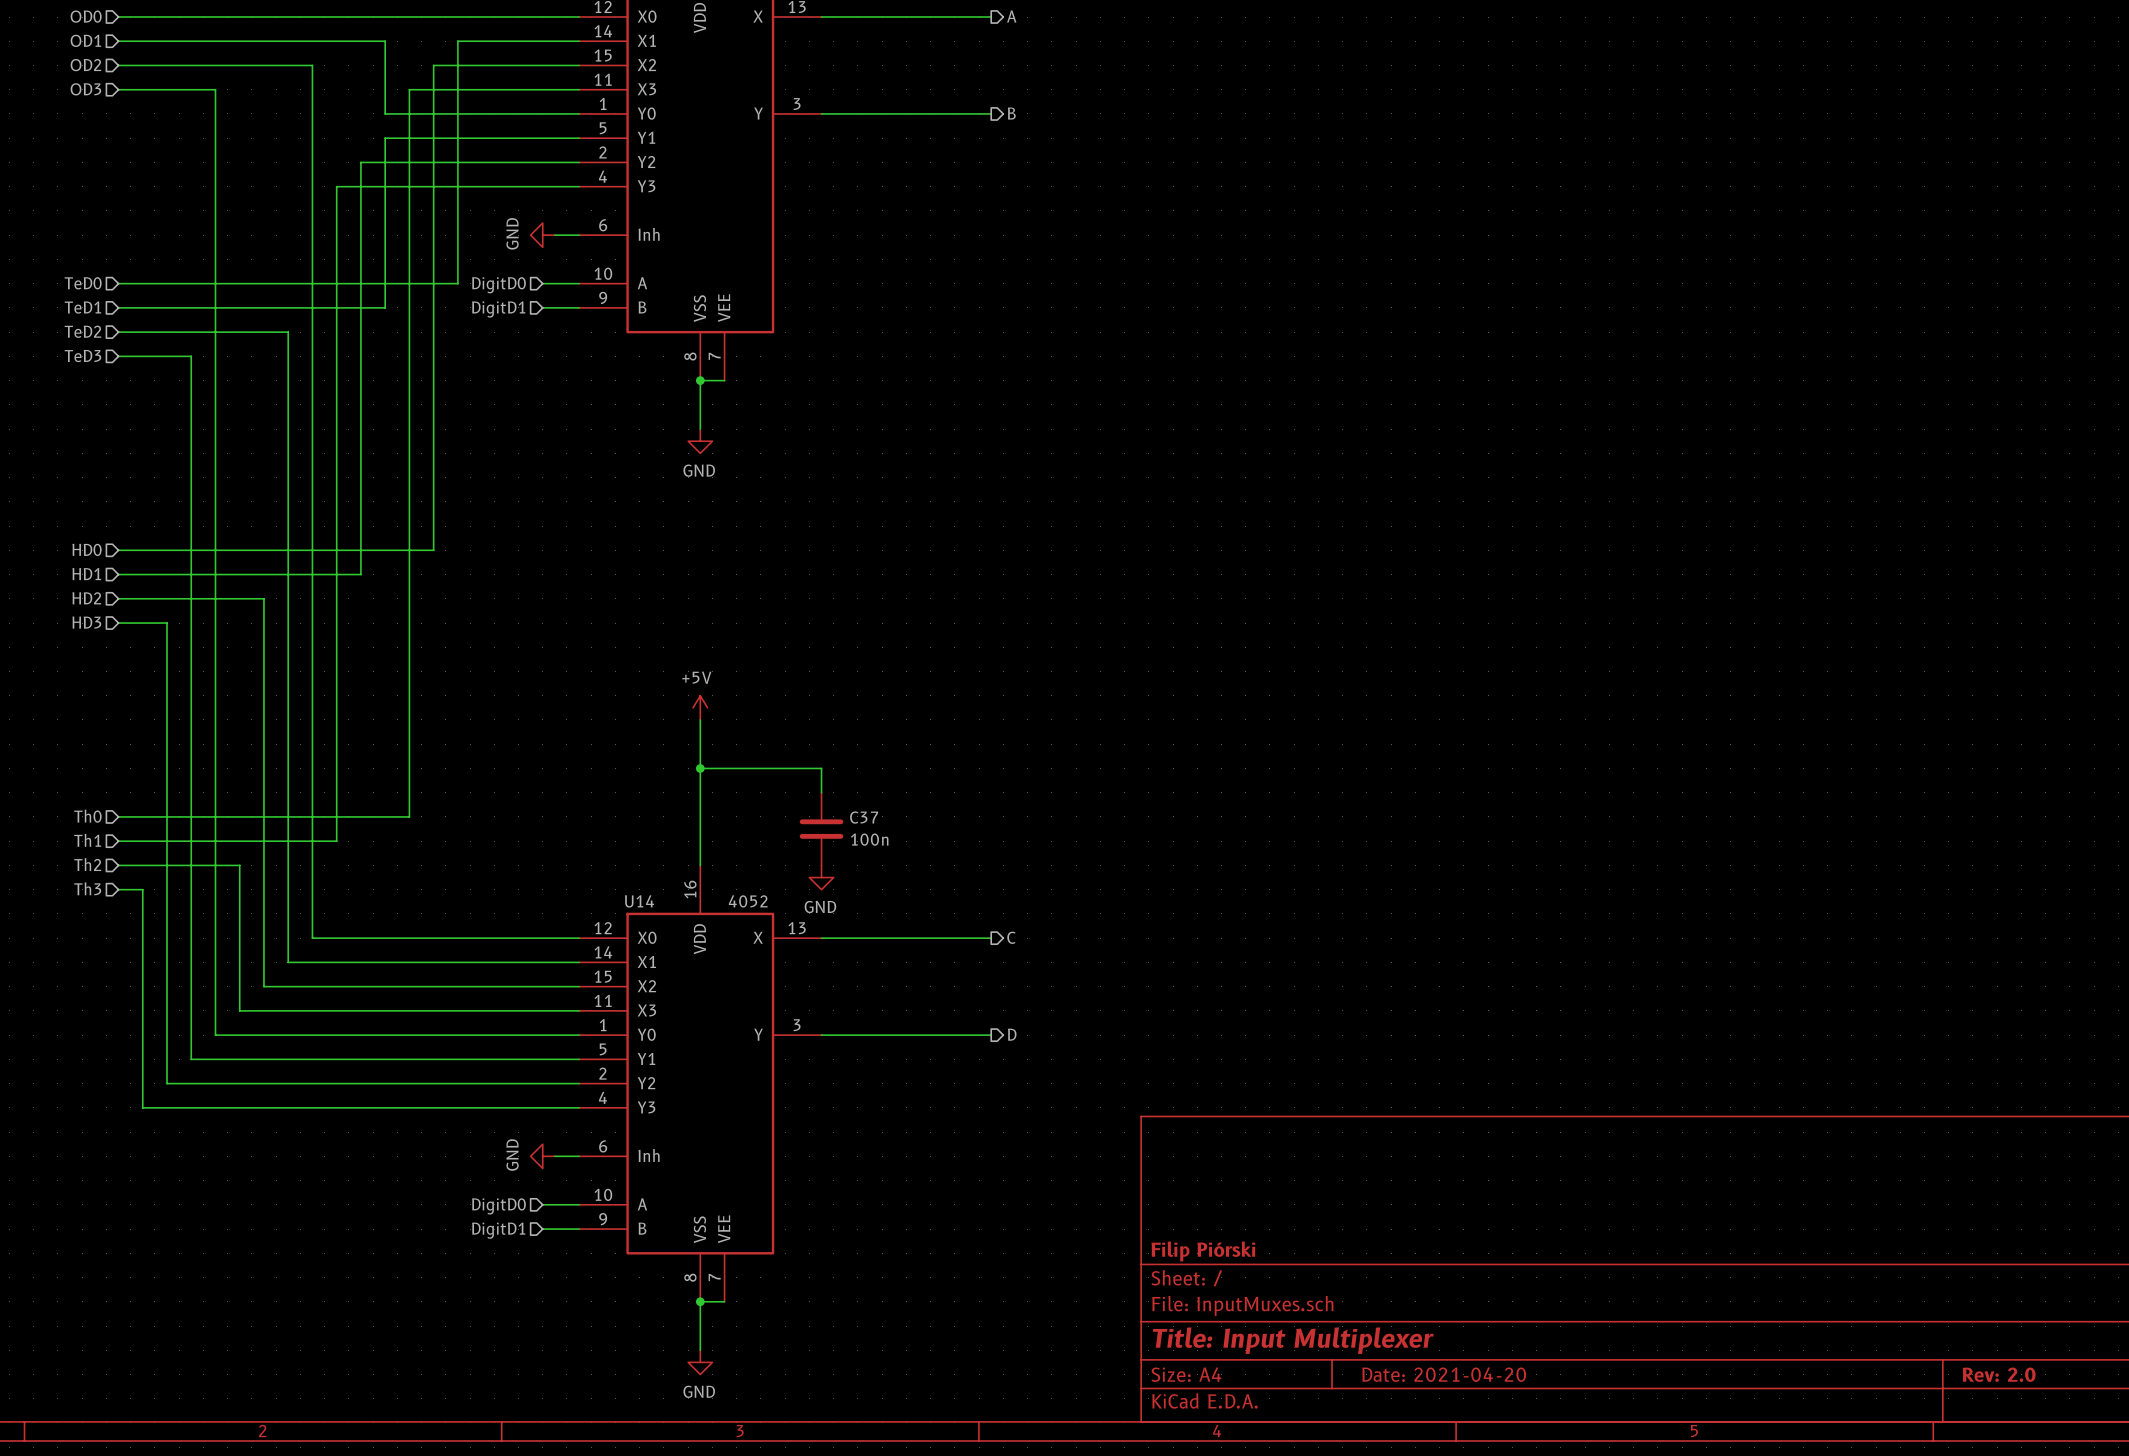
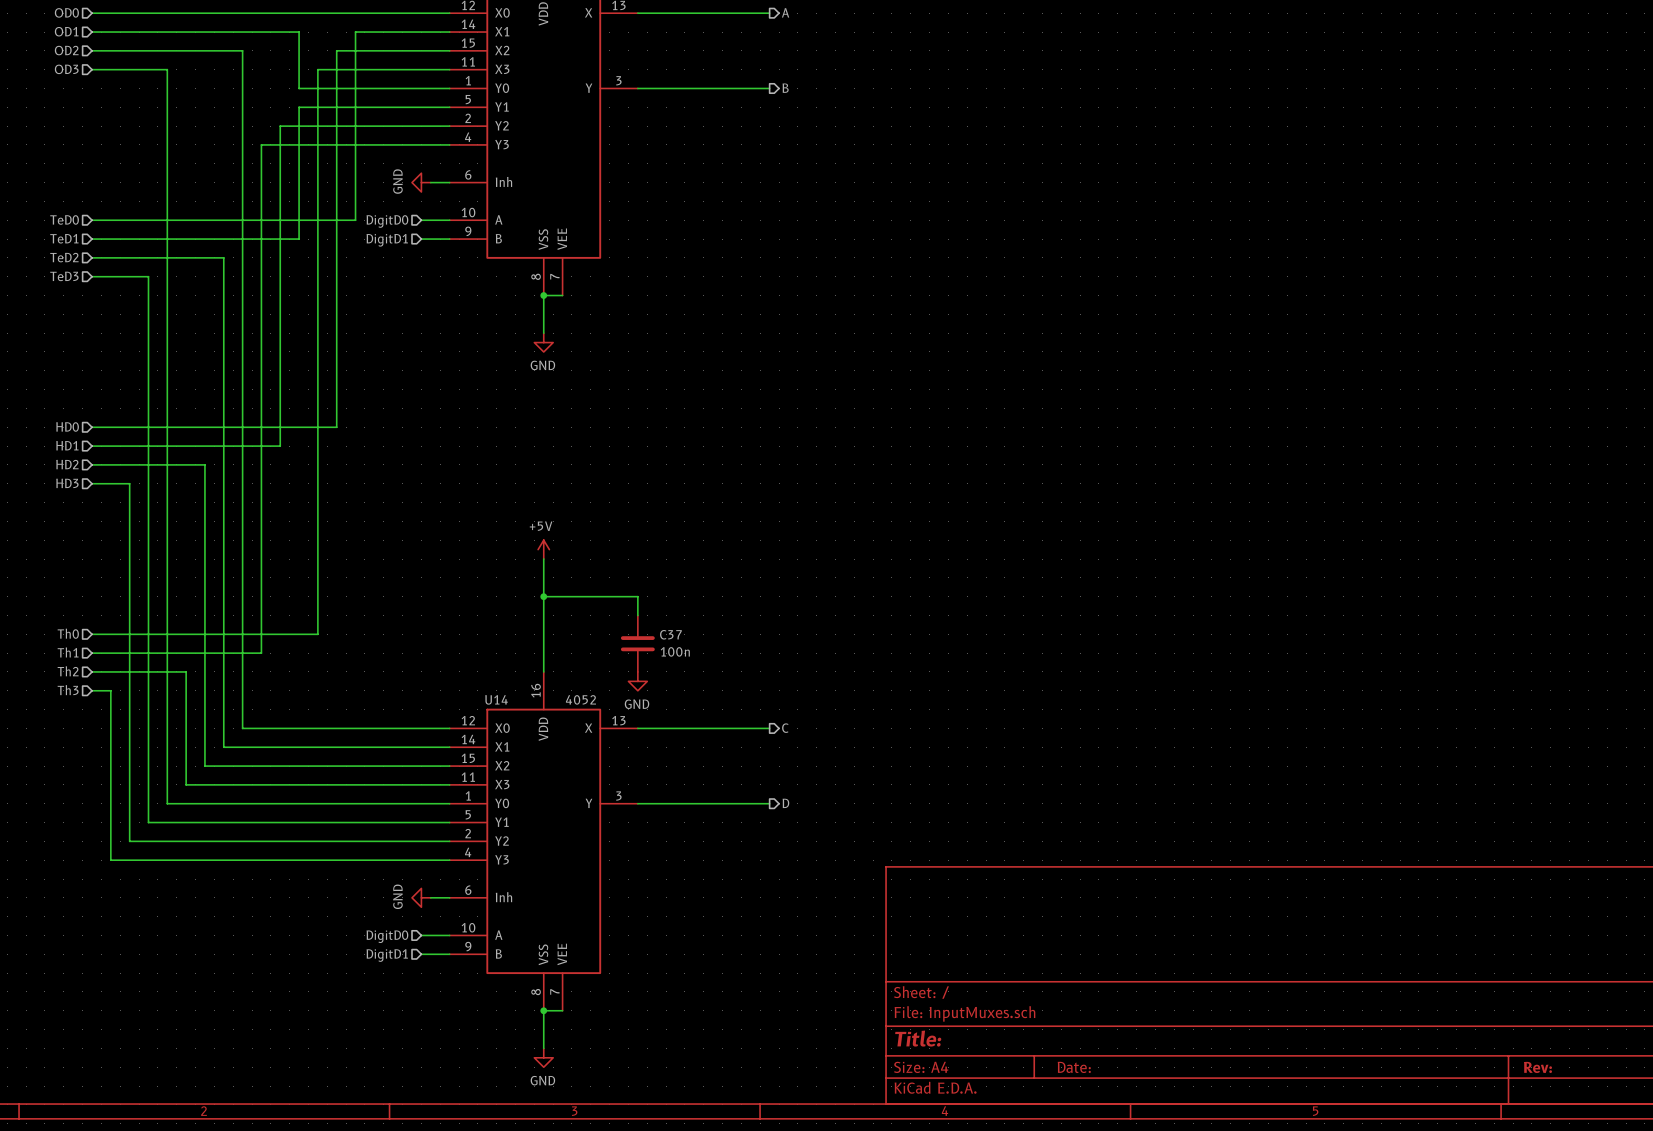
title block: Filip Piórski (1203, 1251) -> none
title block: Title: Input Multiplexer (1293, 1340) -> Title: (918, 1038)
title block: Date: 2021-04-20 (1444, 1374) -> Date: (1074, 1067)
title block: Rev: 2.0 (1999, 1374) -> Rev: (1537, 1067)

